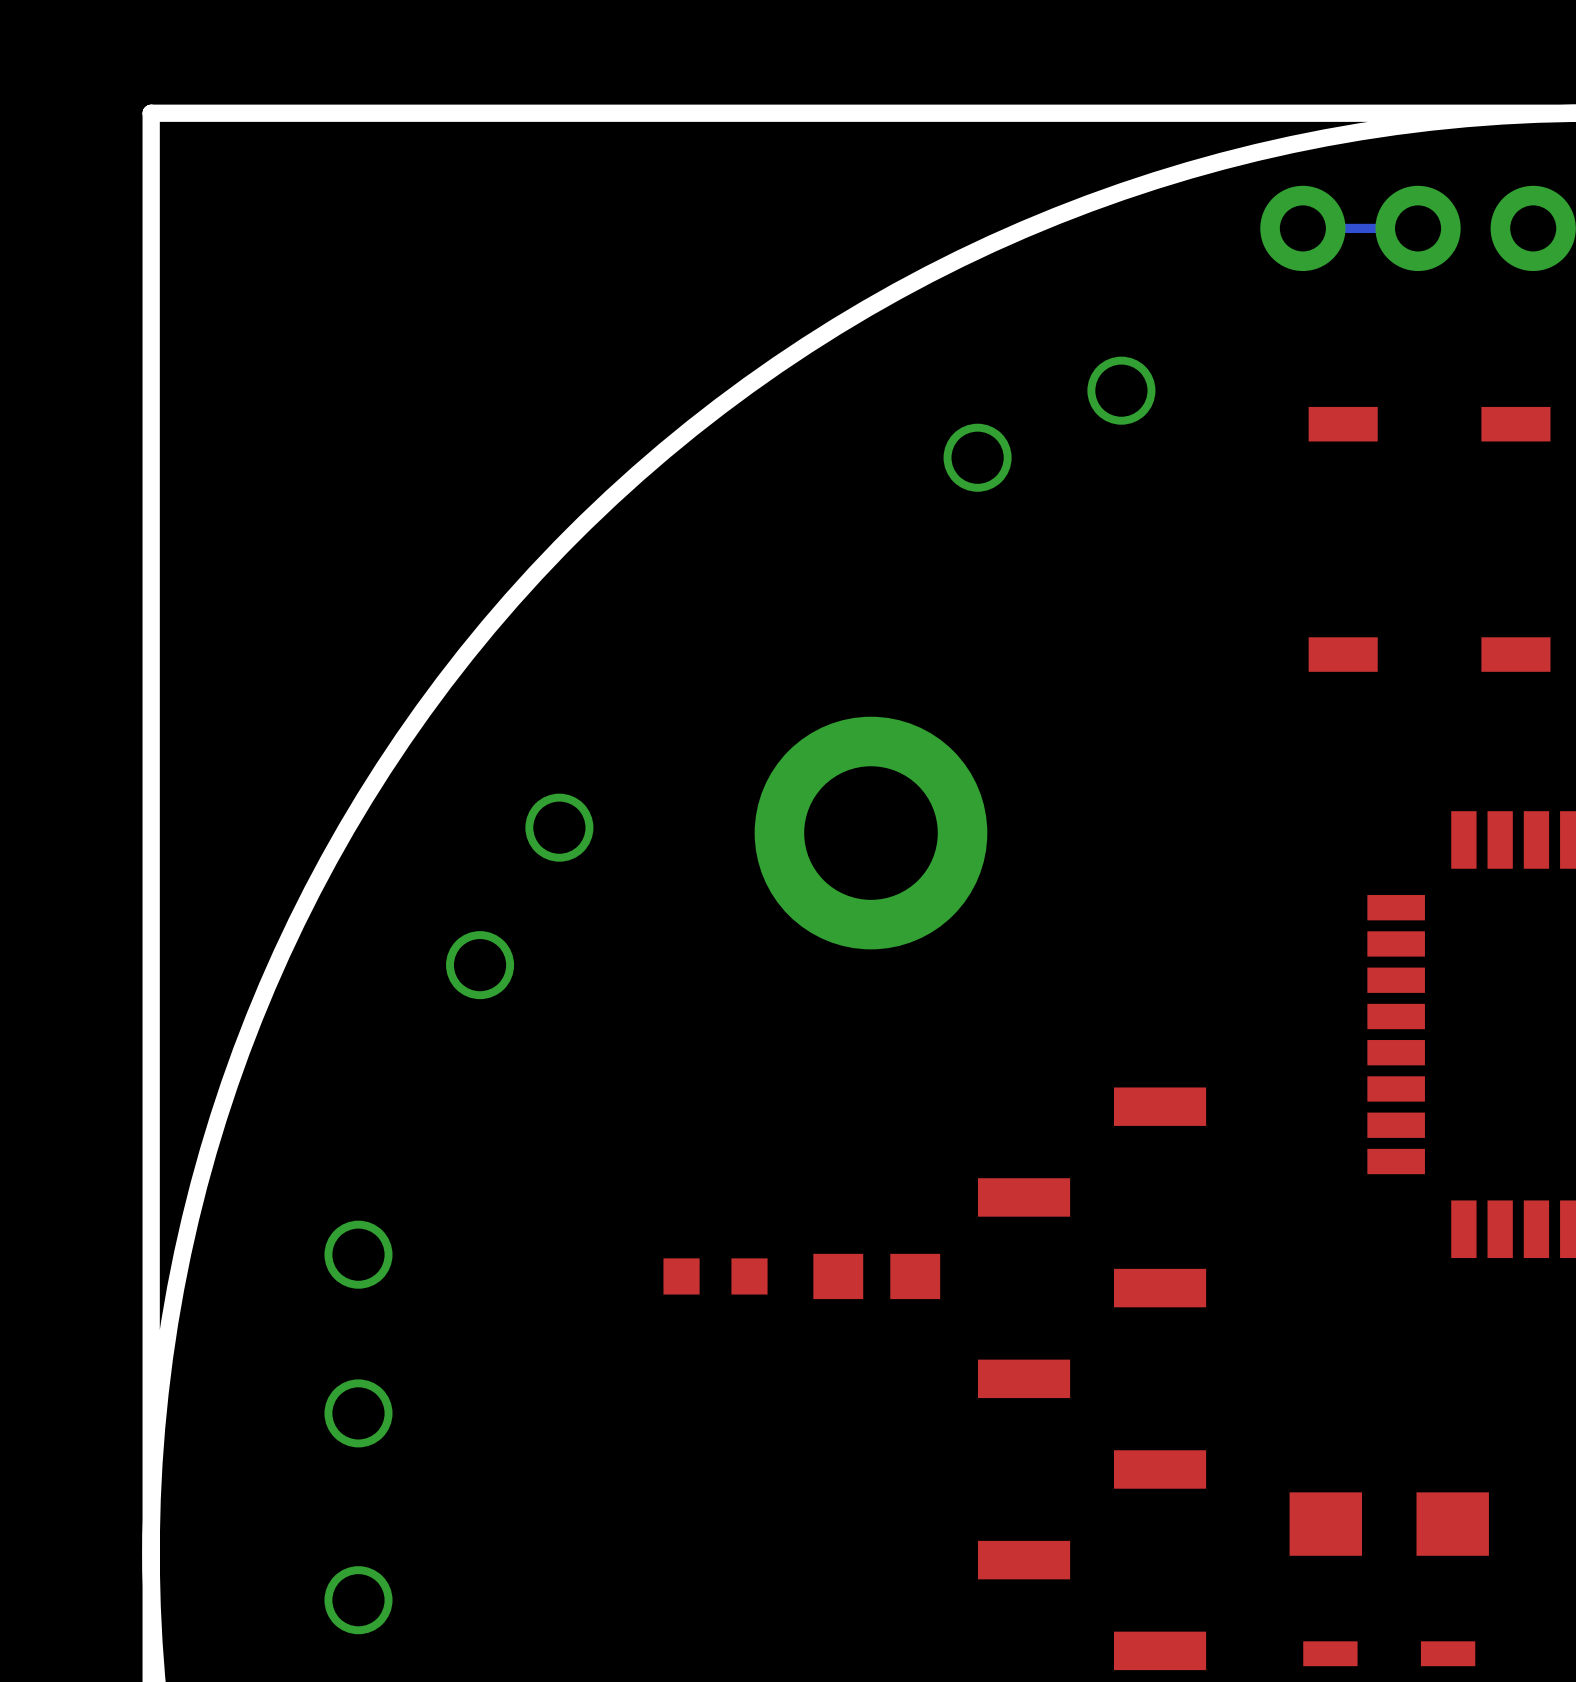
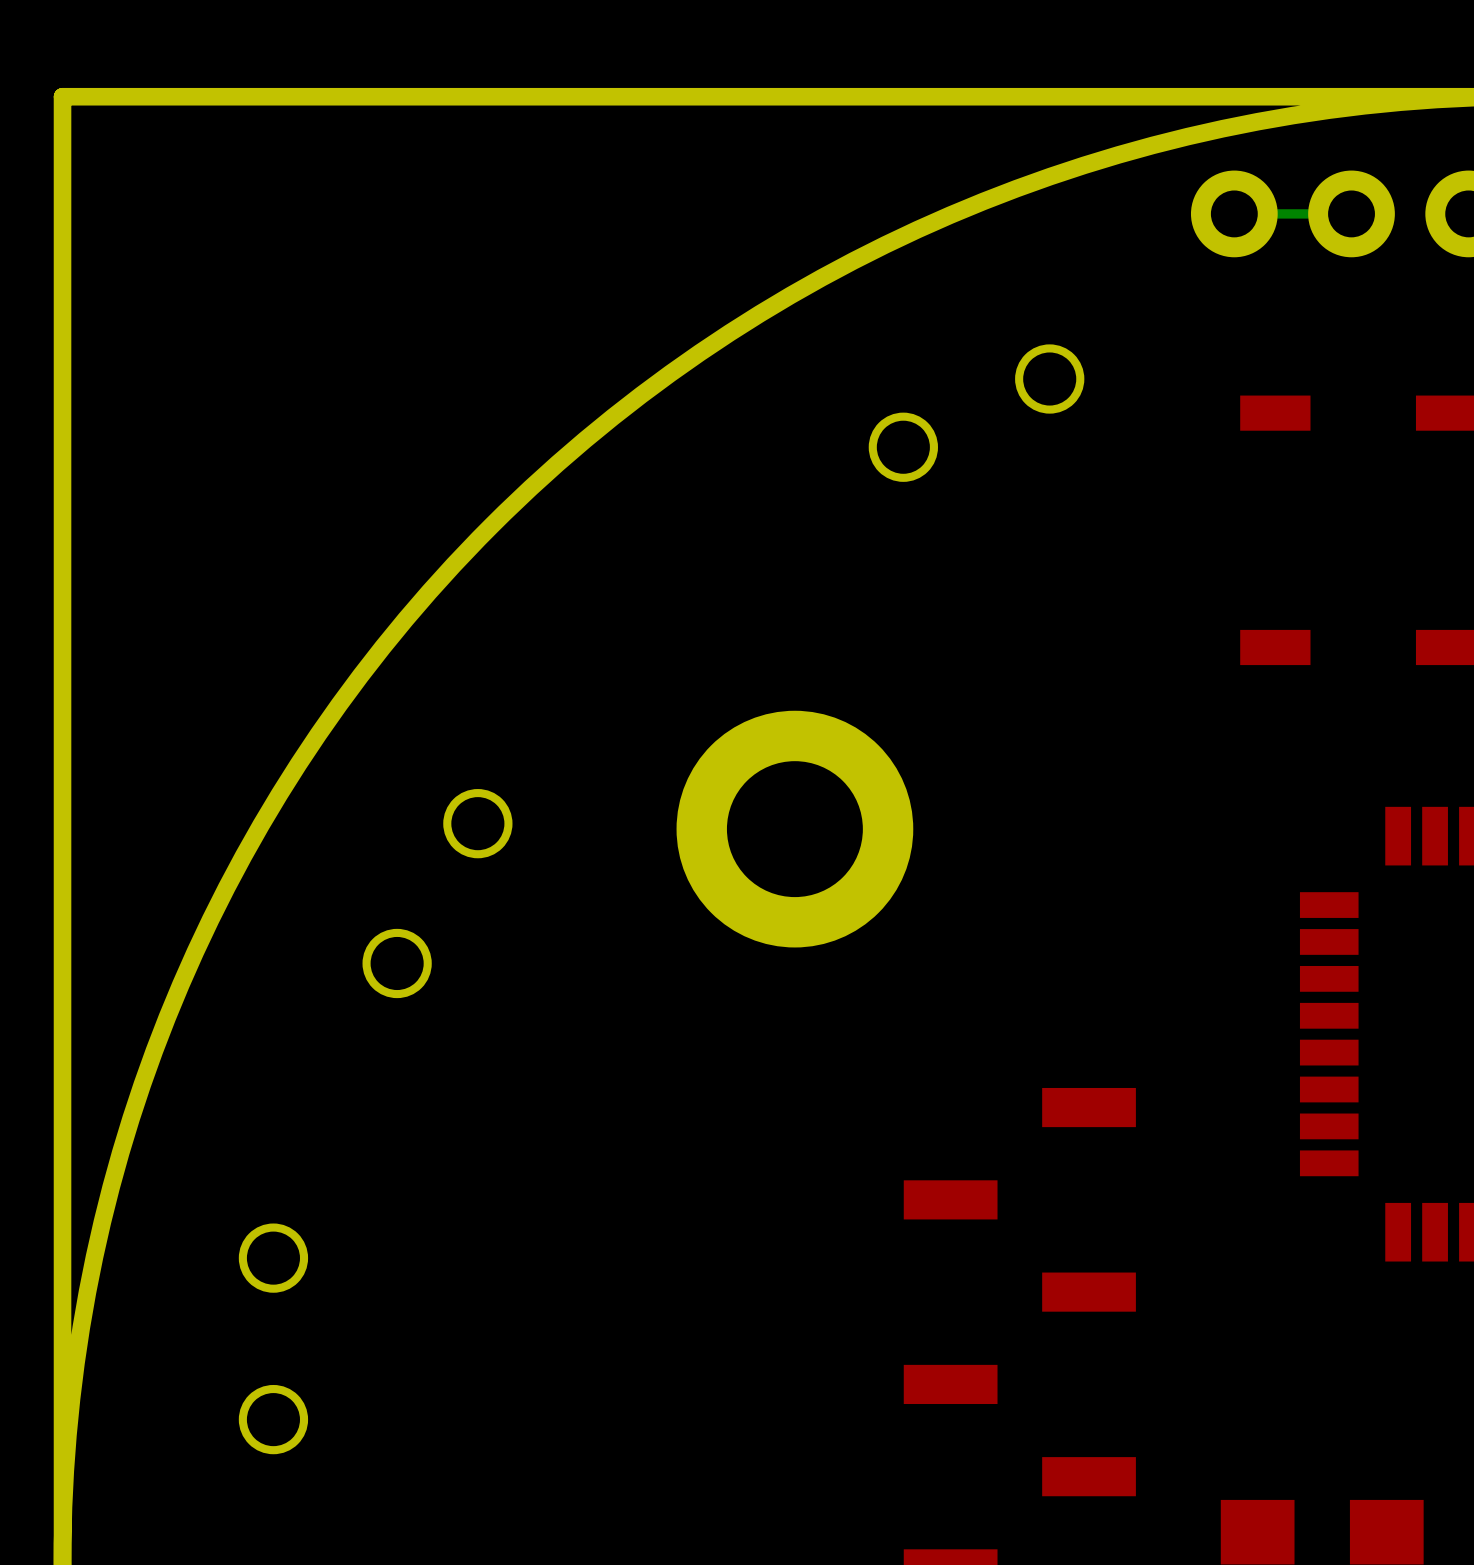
part: (715, 1276) -> none
part: (876, 1276) -> none

